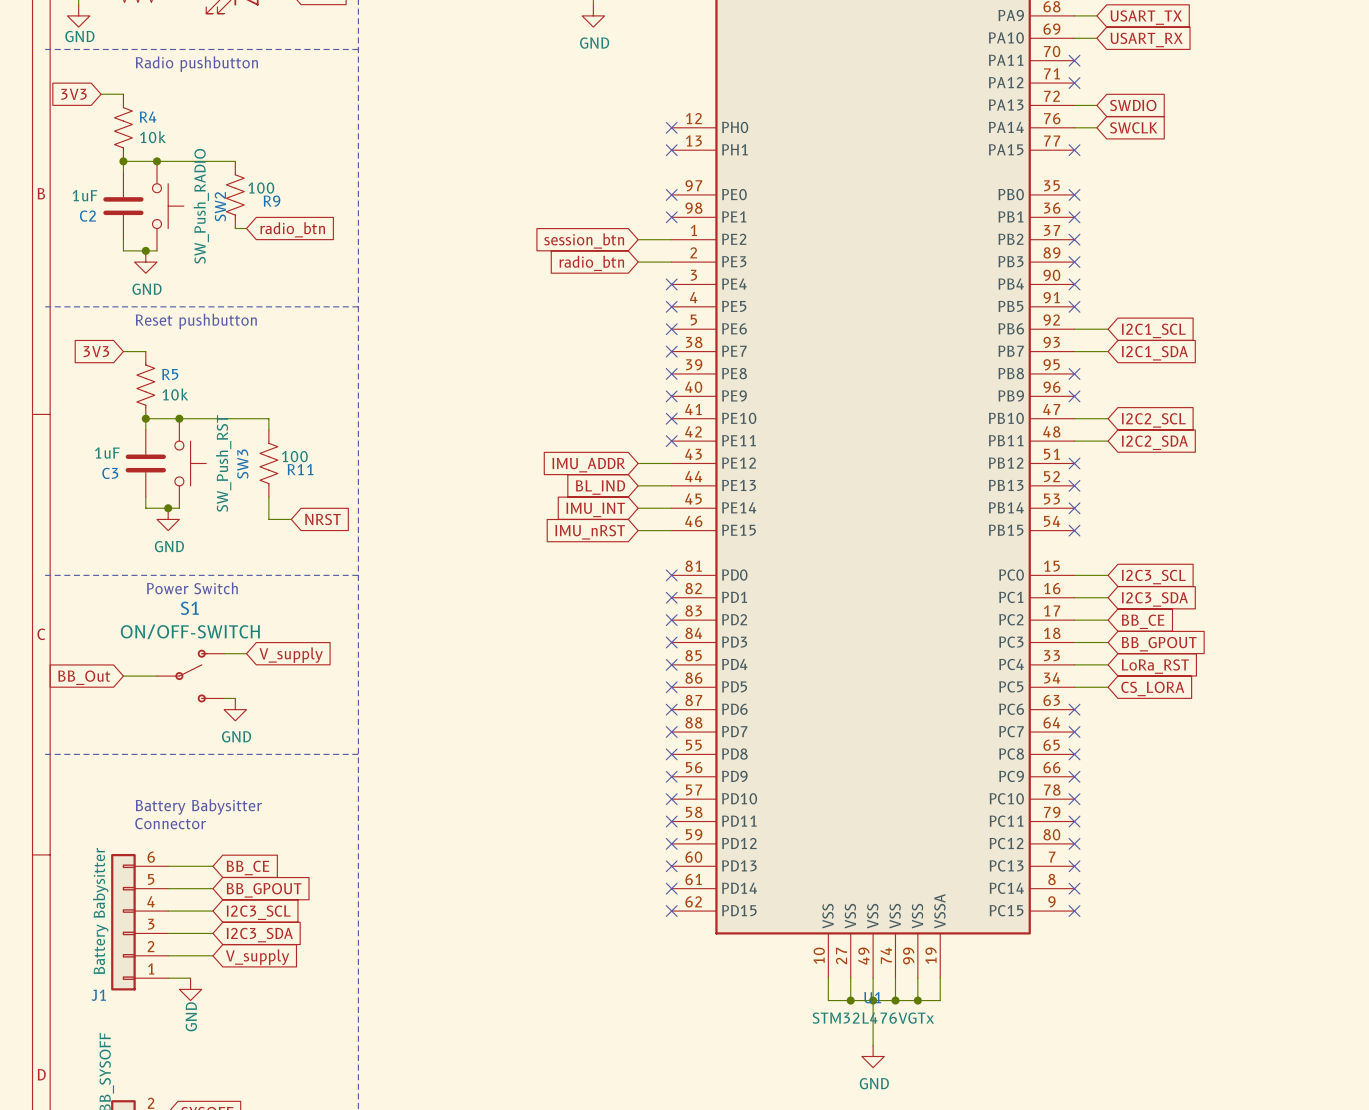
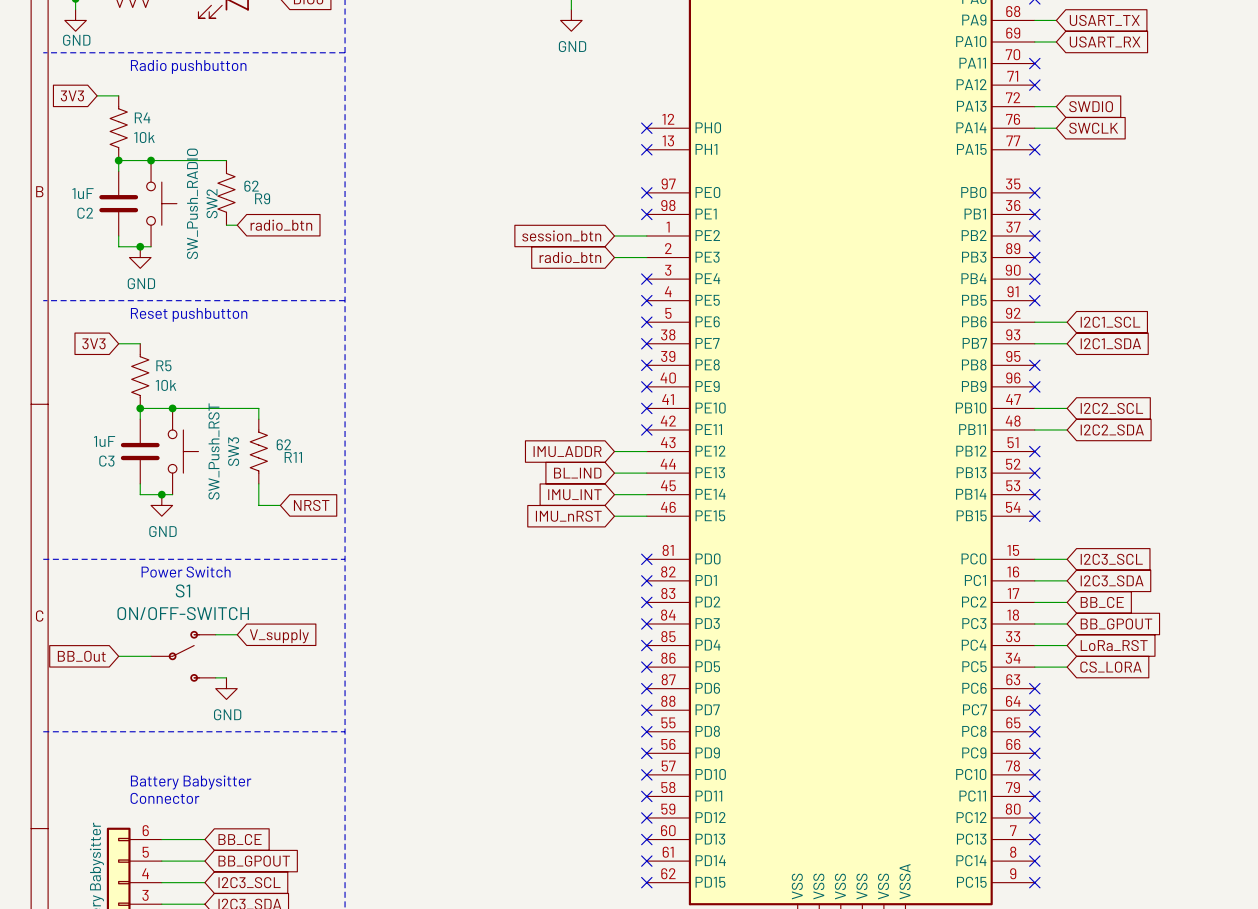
R9 value: 100 (261, 188) -> 62 (251, 186)
R11 value: 100 (294, 456) -> 62 (283, 444)

